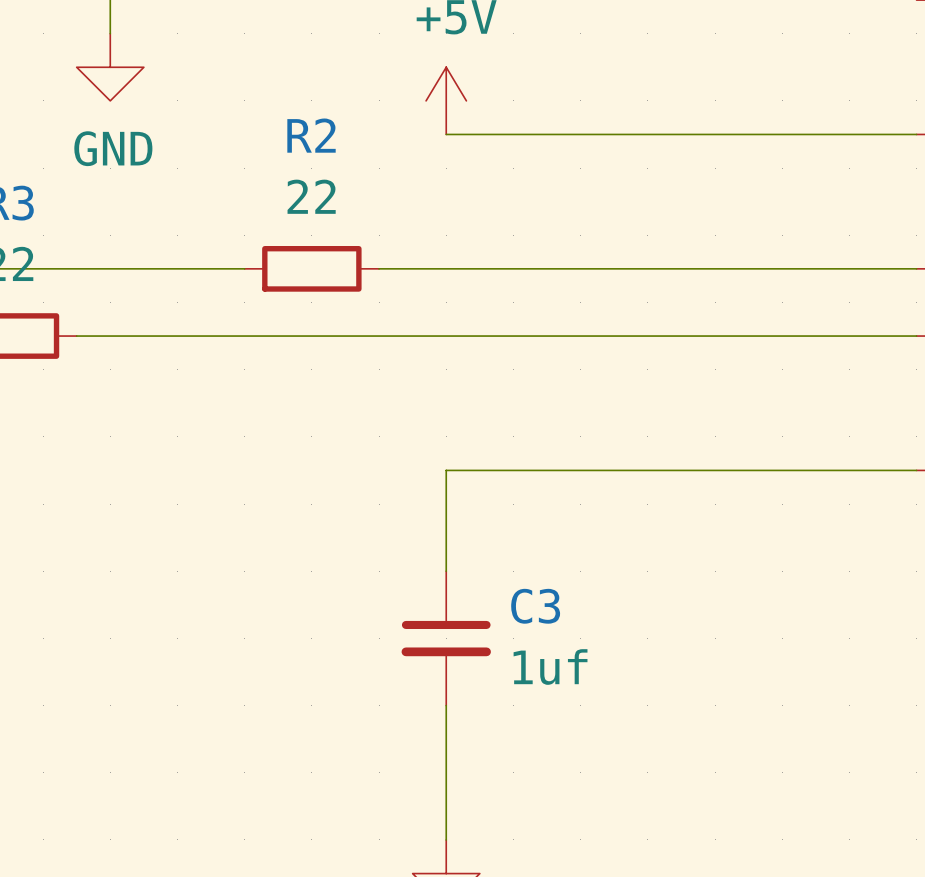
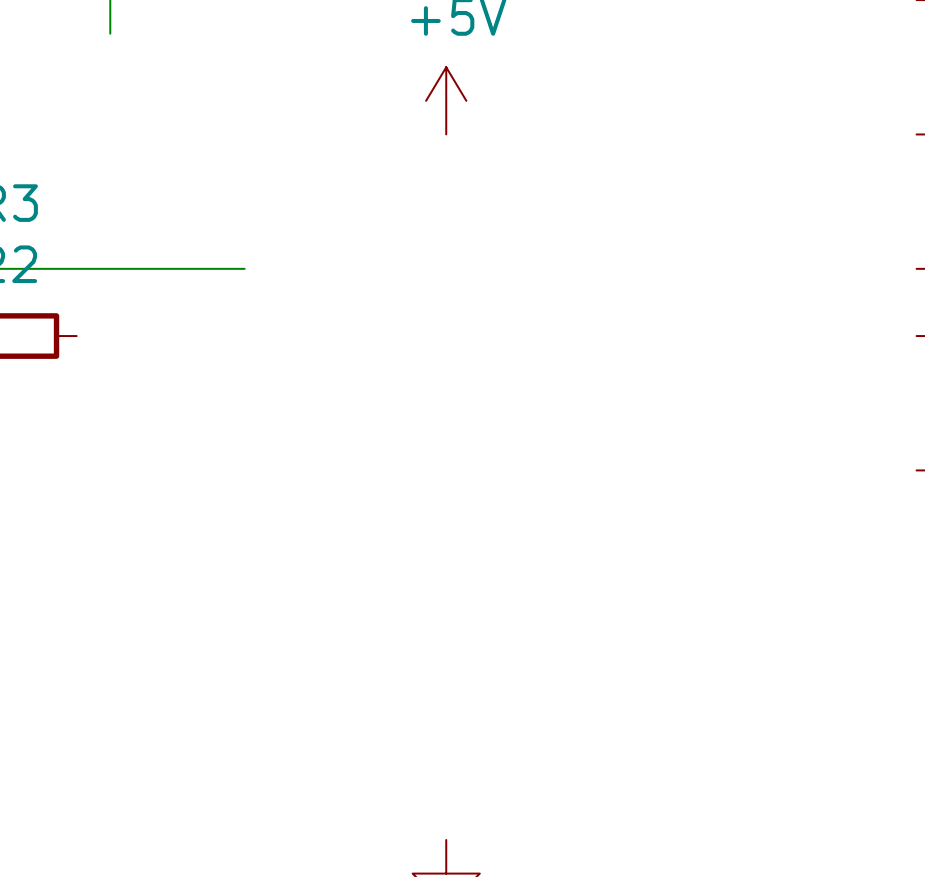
power symbol: GND (110, 67) -> none
wire: (446, 134) (916, 134) -> none
R2: 22 (311, 268) -> none
wire: (379, 268) (916, 268) -> none
wire: (76, 336) (916, 336) -> none
wire: (916, 470) (446, 470) (446, 571) -> none
C3: 1uf (446, 638) -> none
wire: (446, 705) (446, 839) -> none

